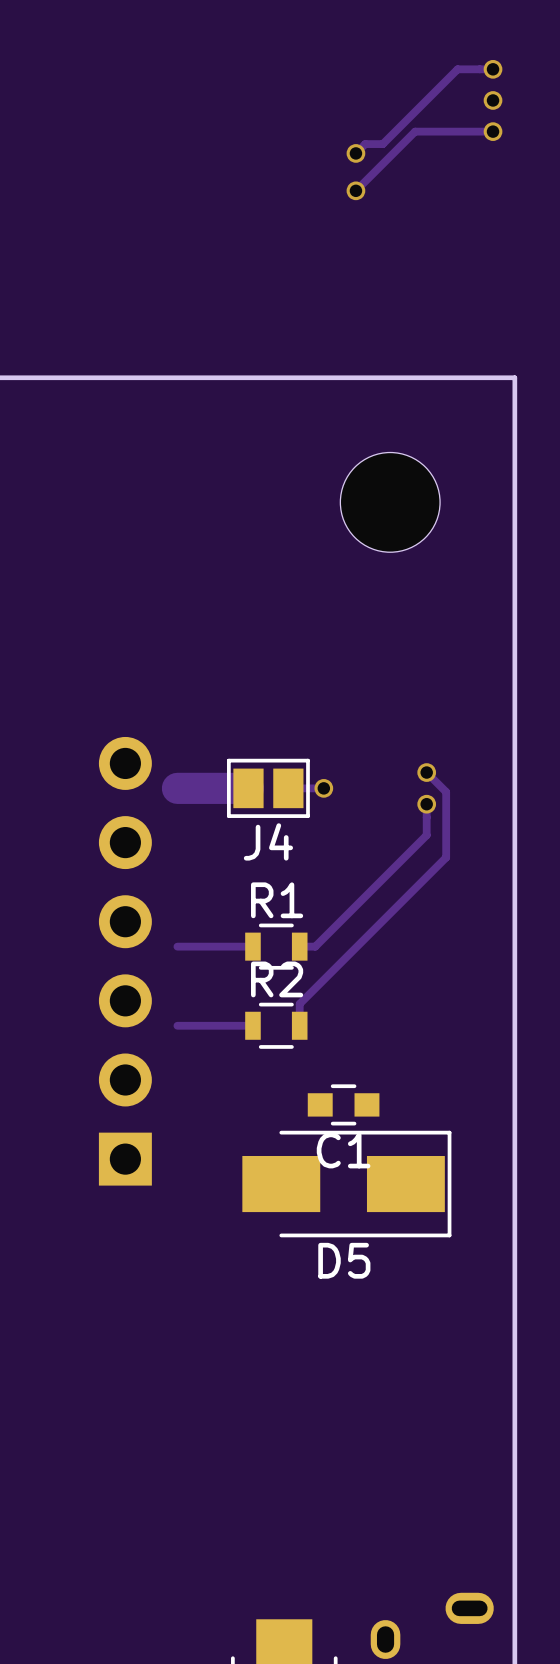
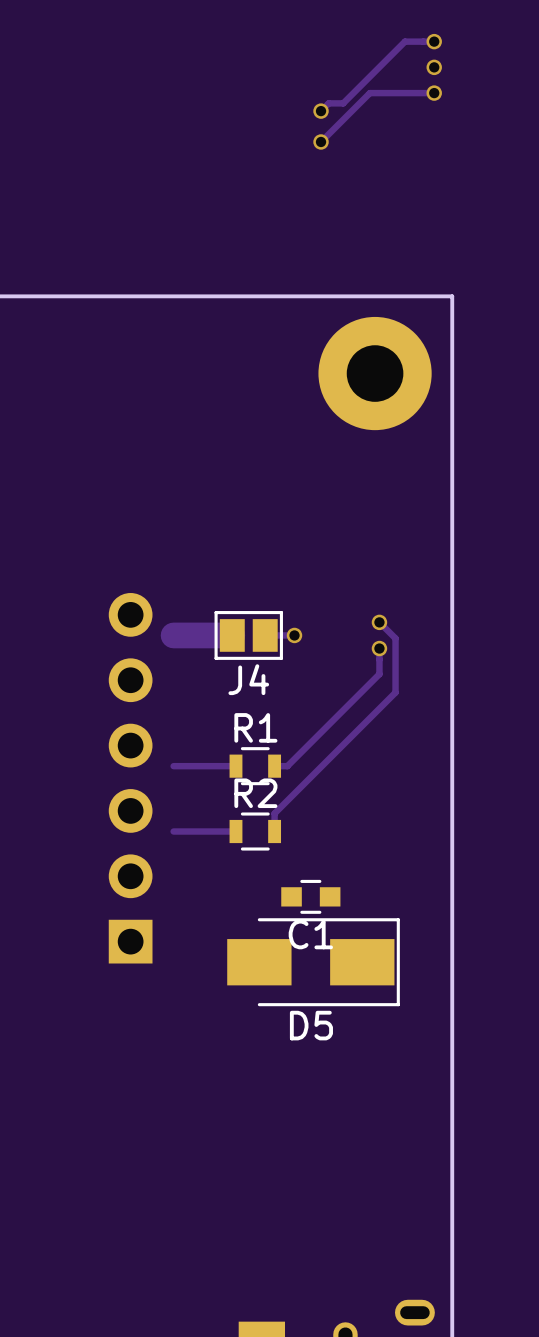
part: none -> (375, 373)
part: (390, 502) -> none

